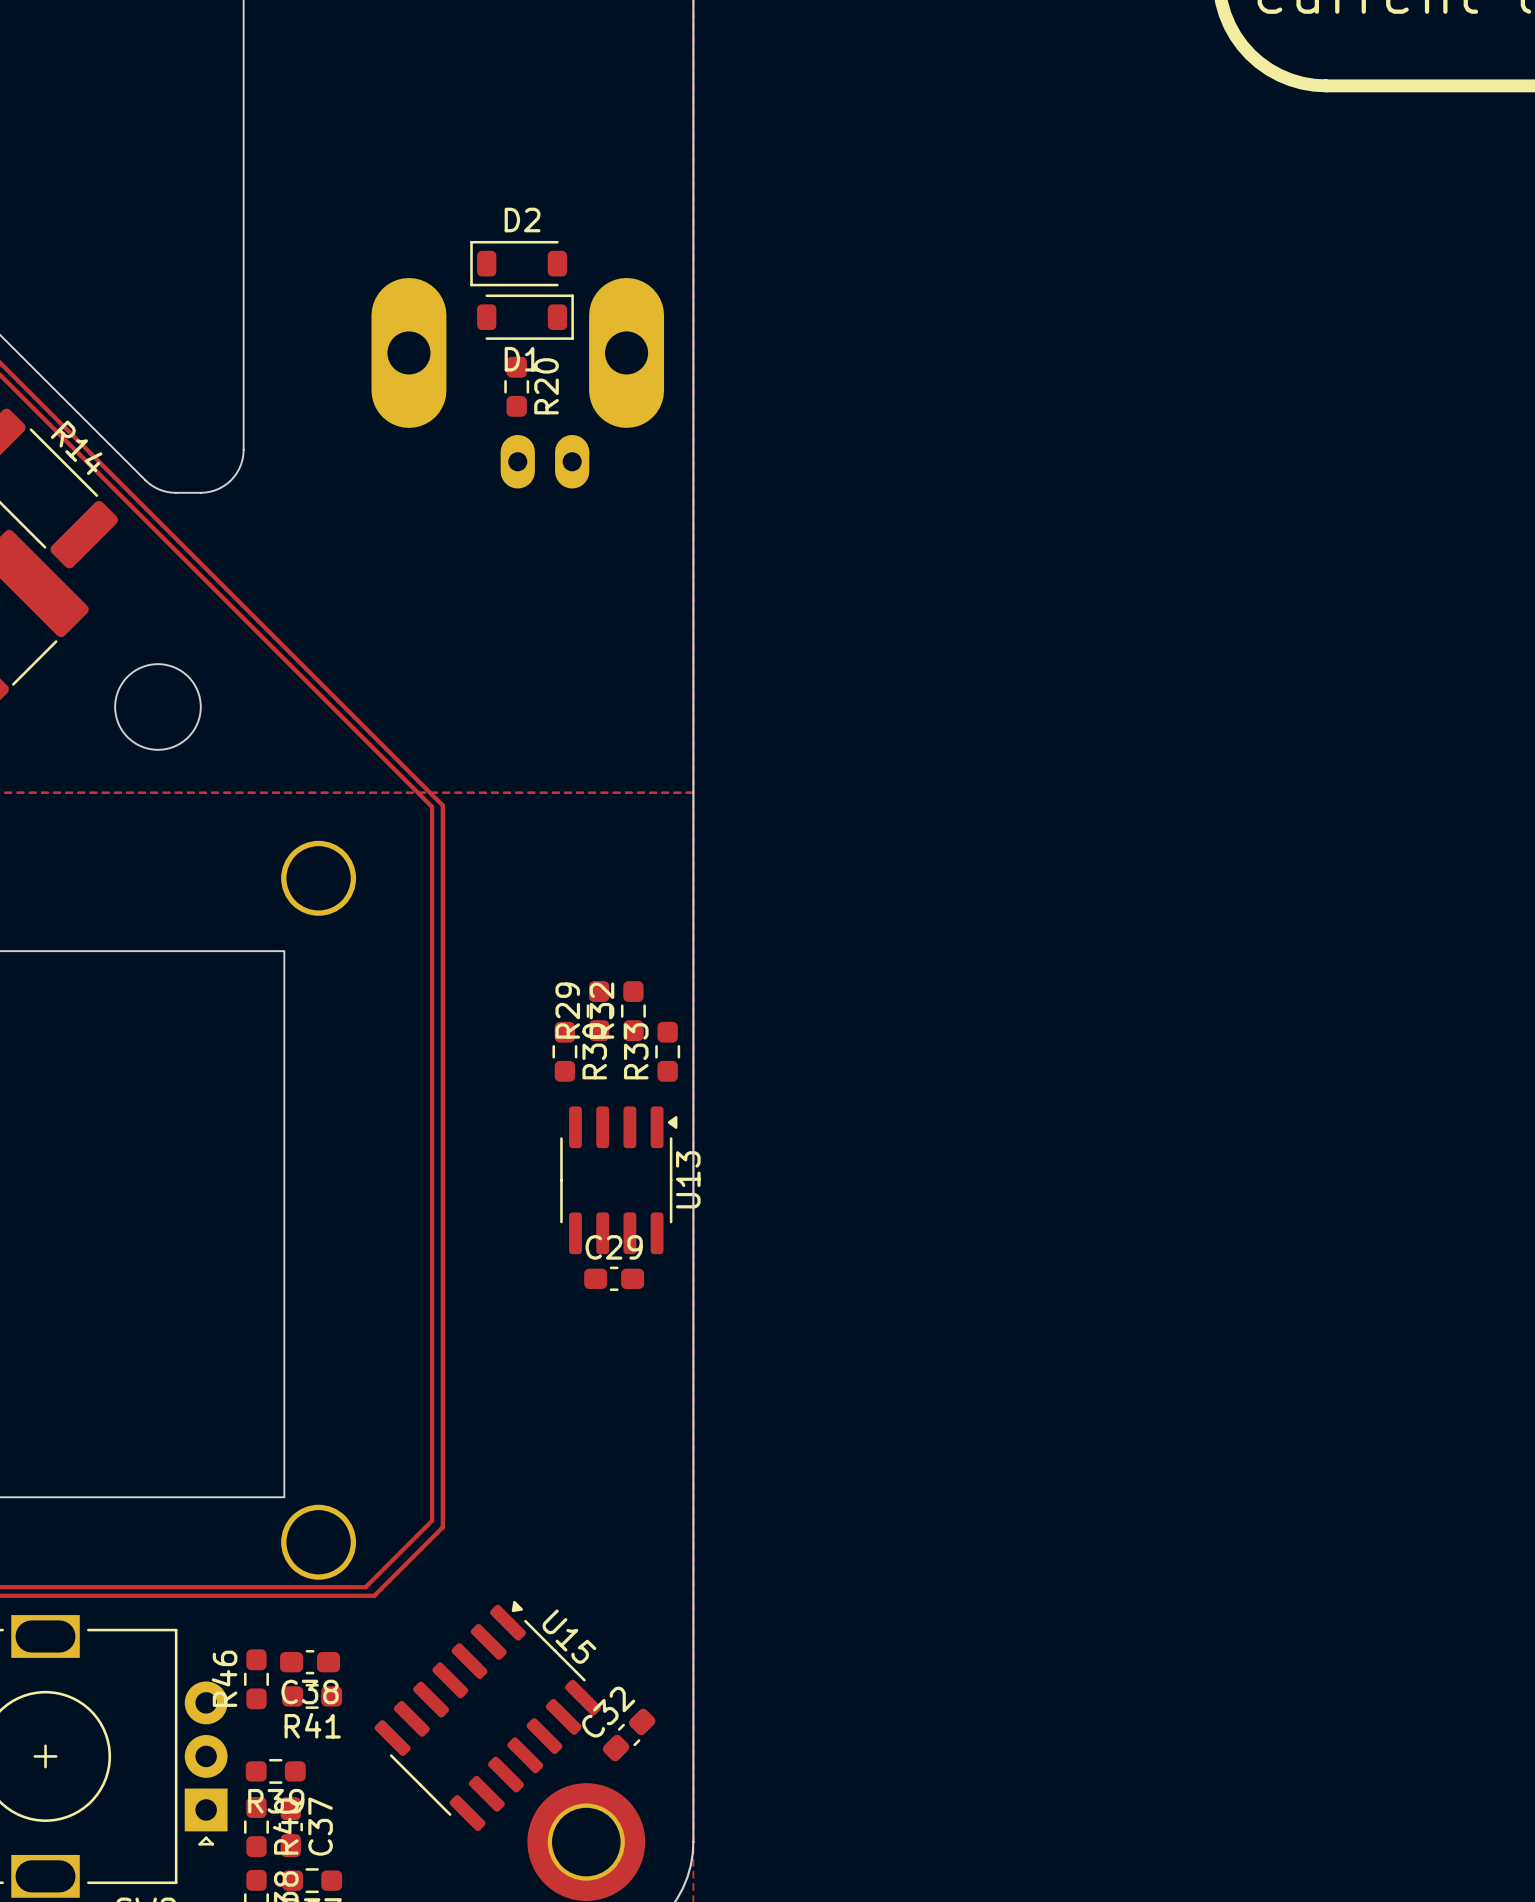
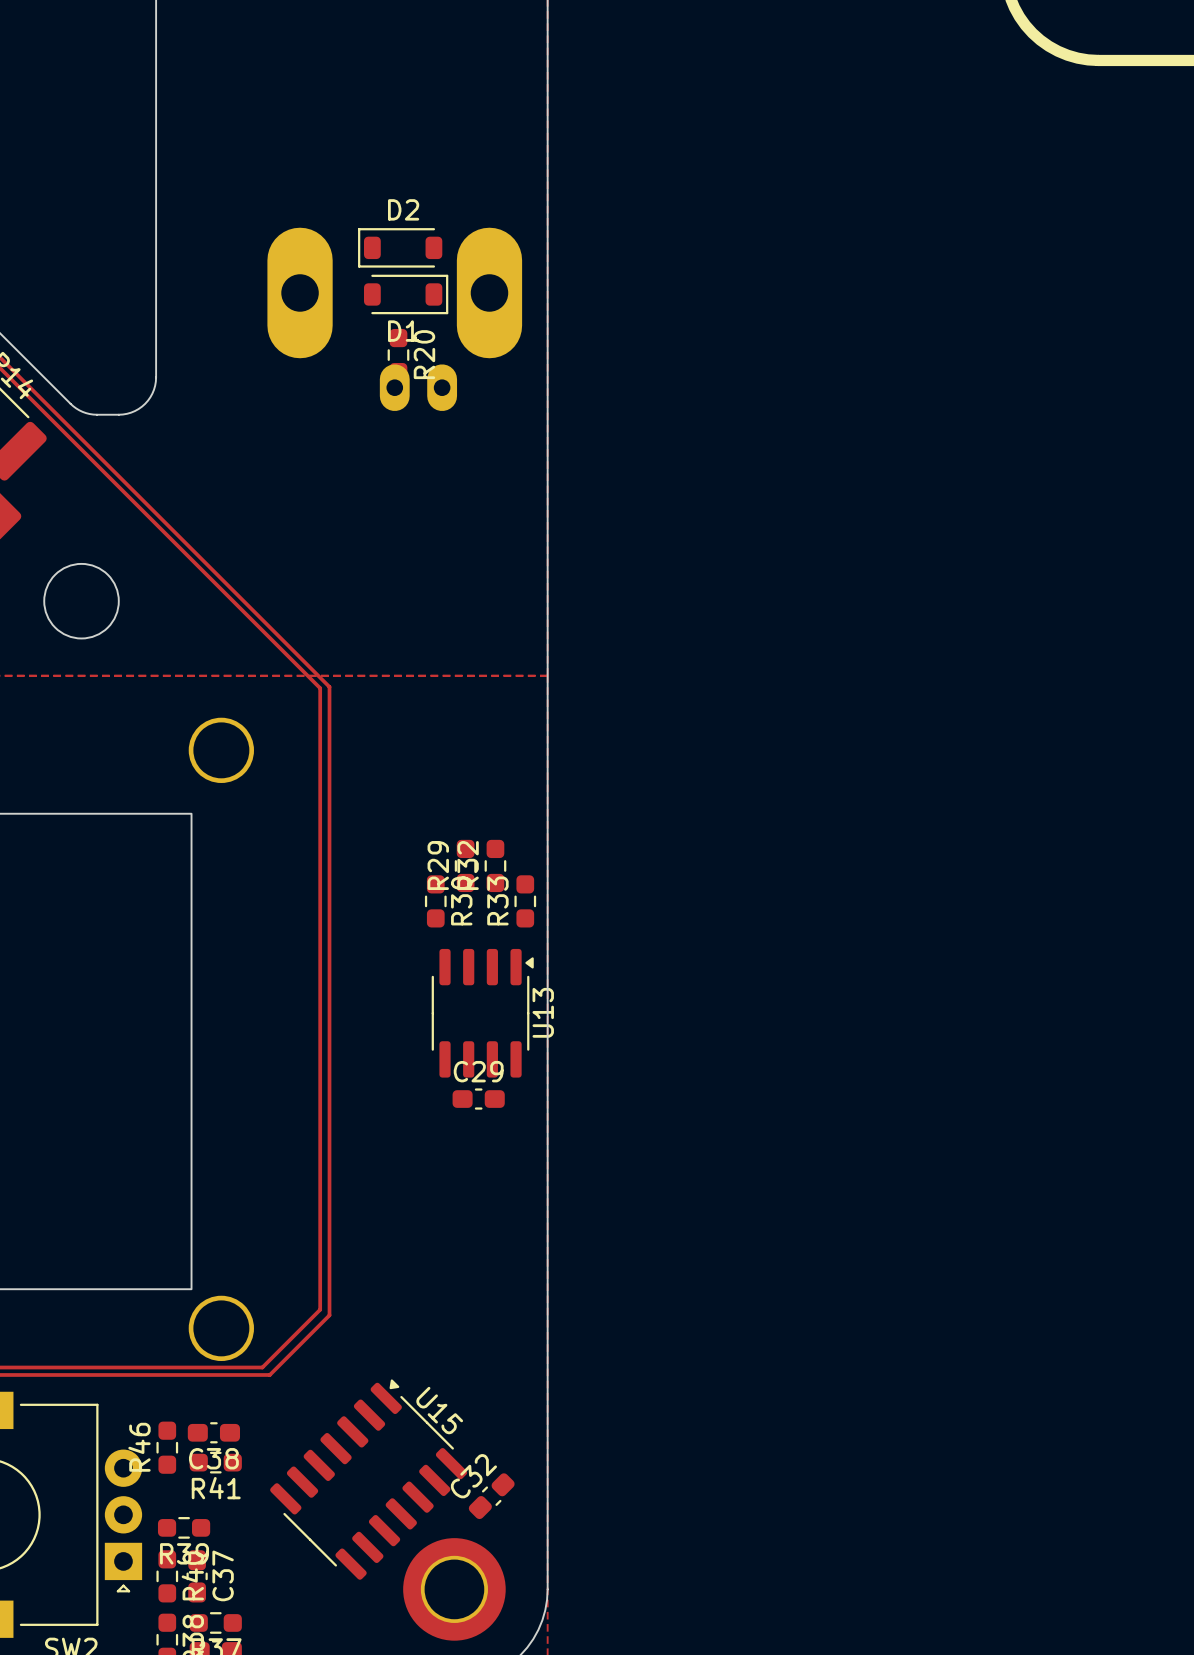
D2 position: (518, 263) -> (400, 247)
D1 position: (525, 317) -> (406, 294)
R20 position: (516, 386) -> (398, 355)

